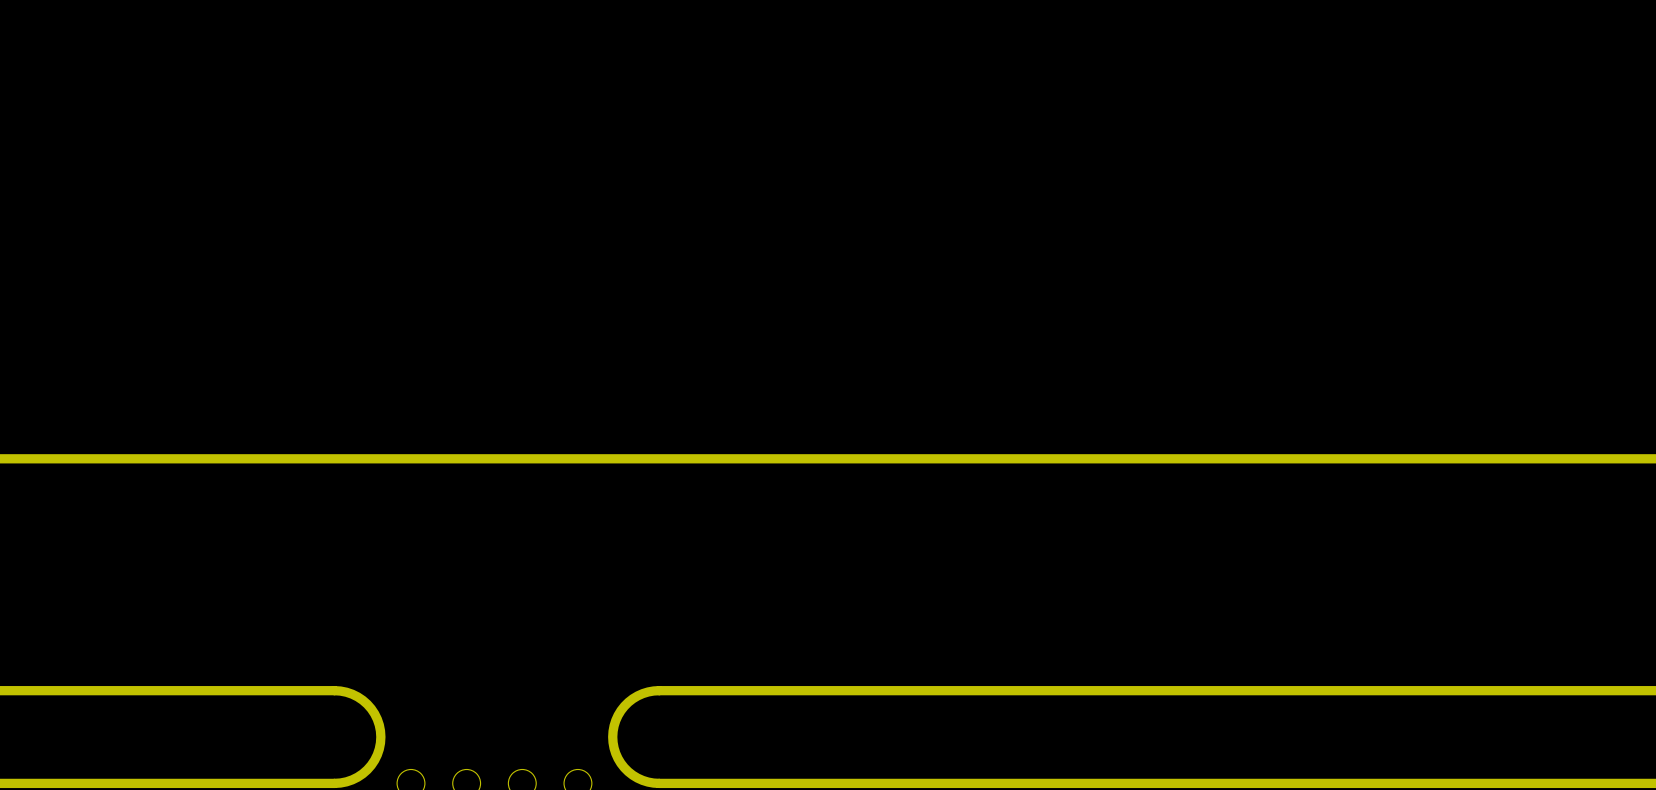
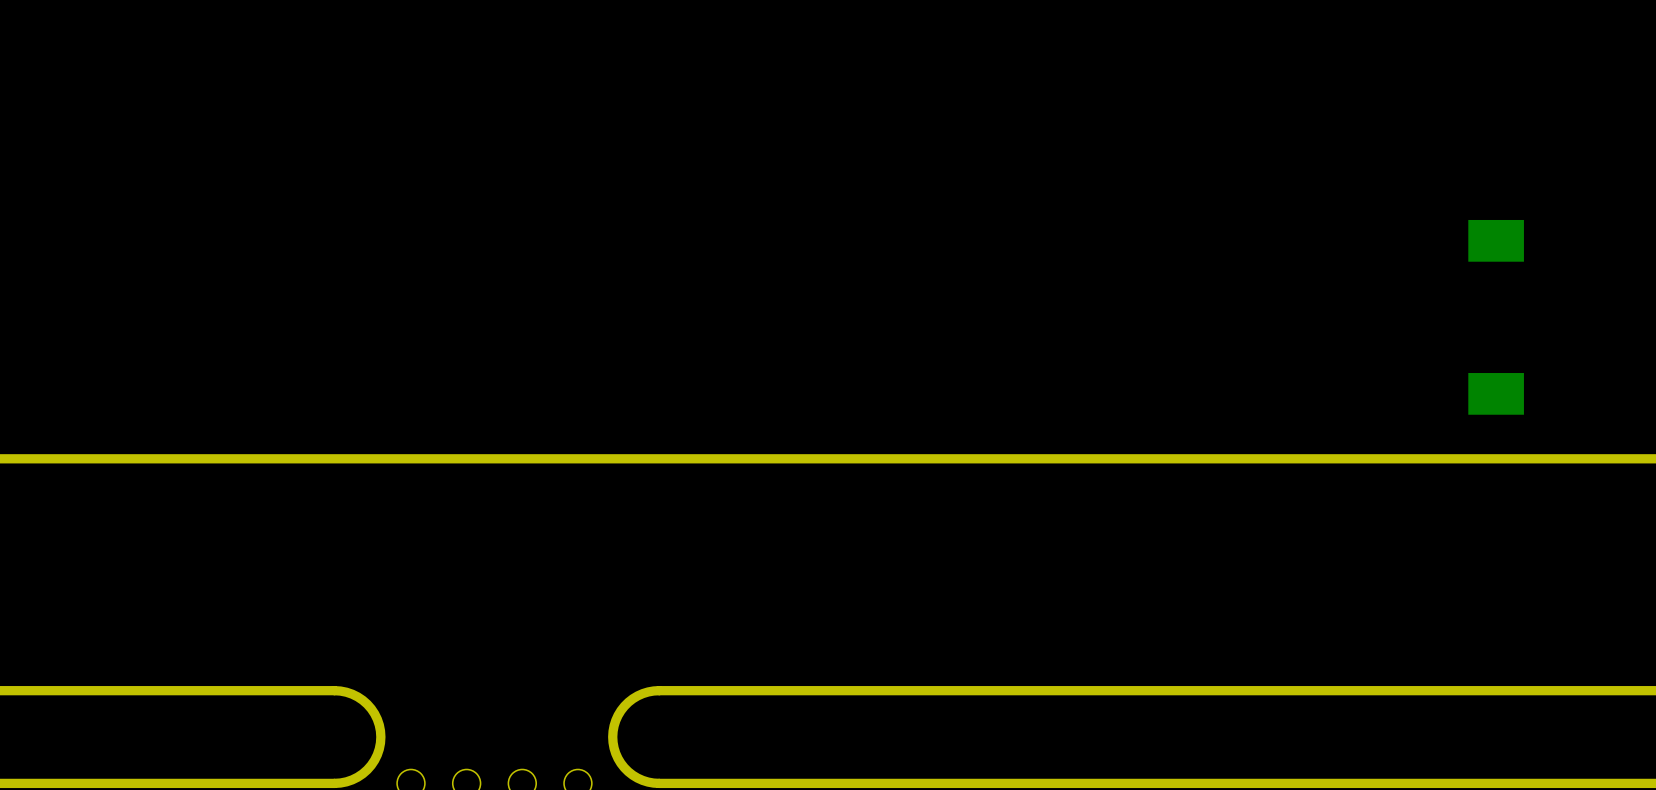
part: none -> (1496, 317)

